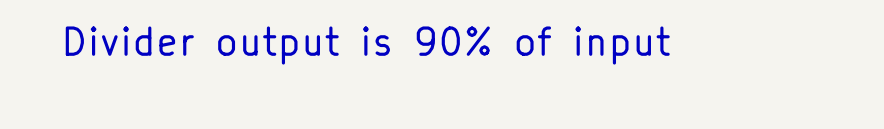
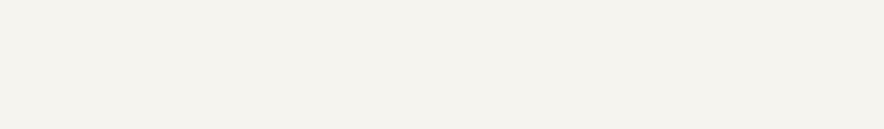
text: Divider output is 90% of input (367, 45) -> none

